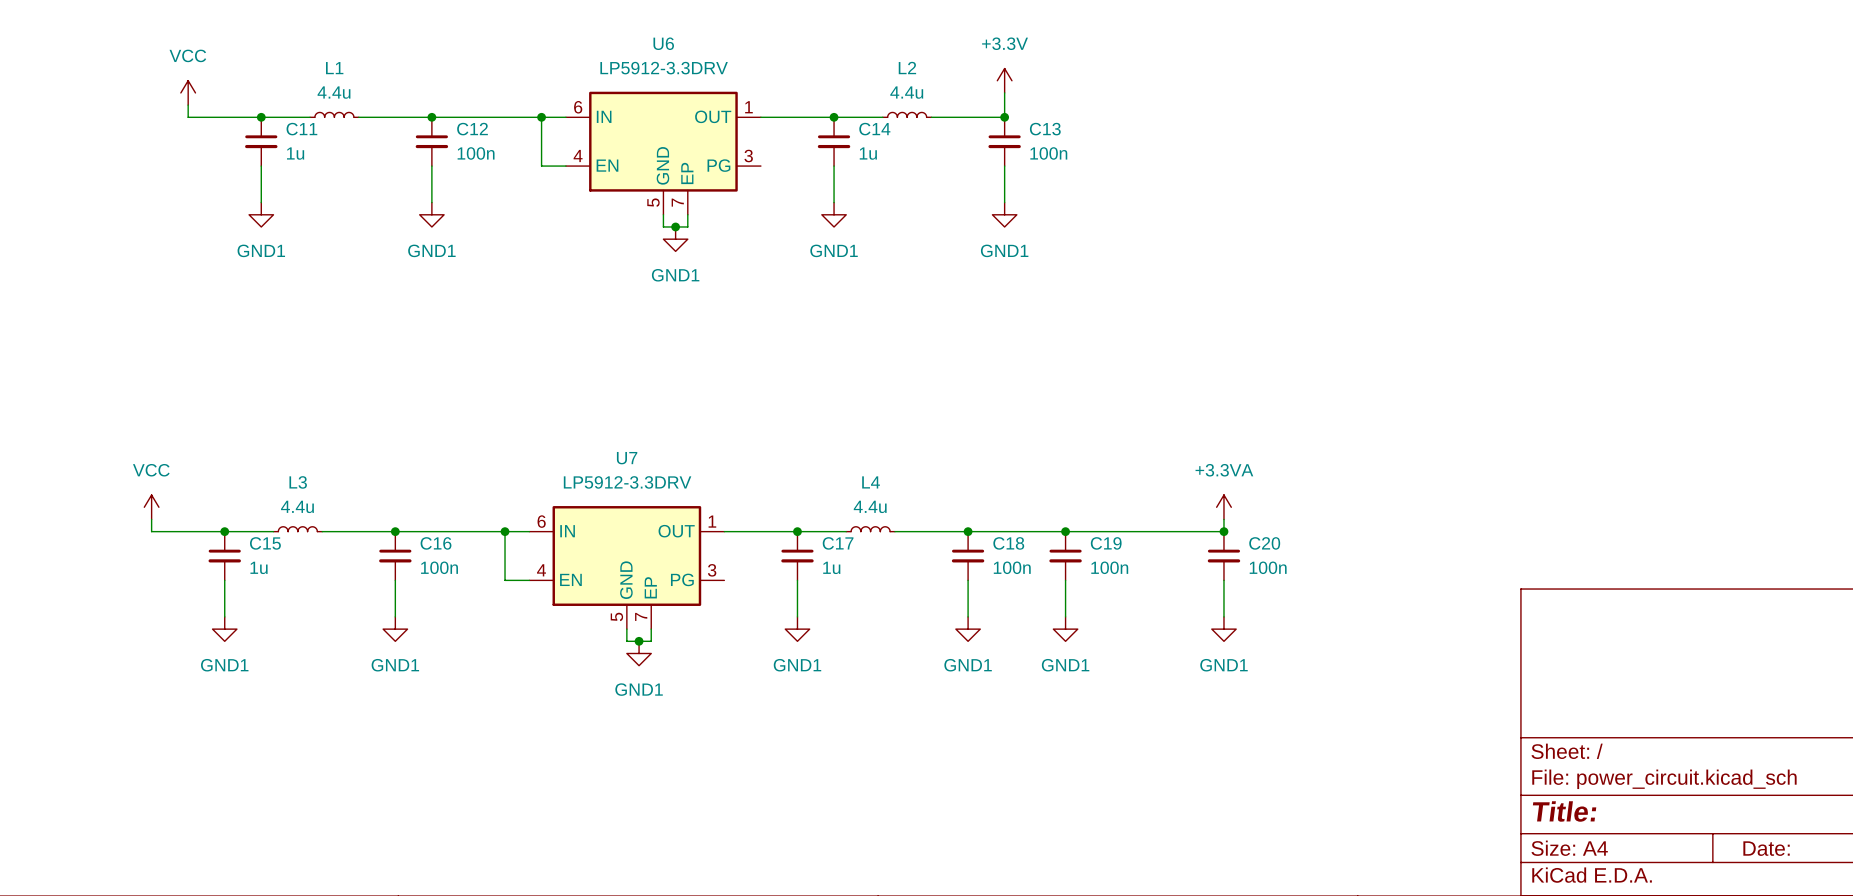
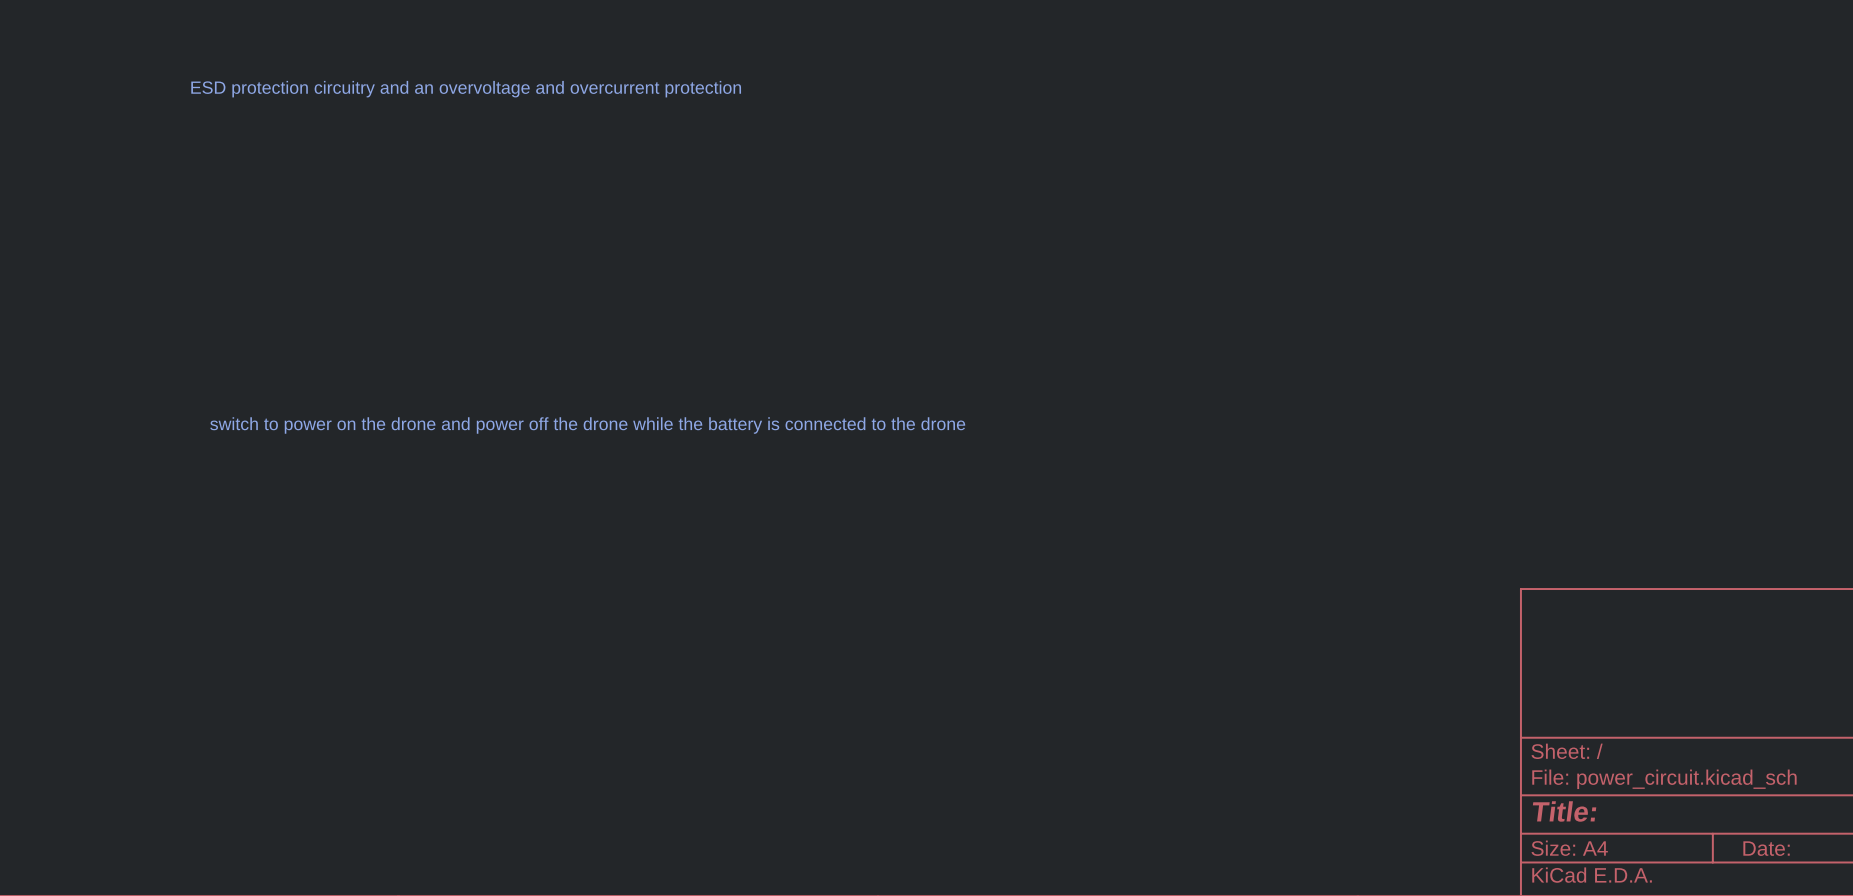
power symbol: +3.3V (1004, 80) -> none
text: none -> ESD protection circuitry and an overvoltage and overcurrent protection (466, 89)
power symbol: VCC (188, 92) -> none
wire: (1004, 92) (1004, 117) (931, 117) -> none
wire: (188, 105) (188, 117) (310, 117) -> none
L1: 4.4u (334, 114) -> none
L2: 4.4u (907, 114) -> none
junction: (261, 117) -> none
wire: (358, 117) (565, 117) -> none
junction: (431, 117) -> none
wire: (541, 117) (541, 166) (565, 166) -> none
junction: (541, 117) -> none
wire: (760, 117) (882, 117) -> none
junction: (834, 117) -> none
junction: (1004, 117) -> none
C11: 1u (261, 141) -> none
C12: 100n (431, 141) -> none
C14: 1u (834, 141) -> none
C13: 100n (1004, 141) -> none
U6: LP5912-3.3DRV (663, 153) -> none
wire: (261, 166) (261, 202) -> none
wire: (431, 166) (431, 202) -> none
wire: (834, 166) (834, 202) -> none
wire: (1004, 166) (1004, 202) -> none
power symbol: GND1 (261, 214) -> none
power symbol: GND1 (431, 214) -> none
wire: (663, 214) (663, 226) (687, 226) (687, 214) -> none
power symbol: GND1 (834, 214) -> none
power symbol: GND1 (1004, 214) -> none
junction: (675, 226) -> none
power symbol: GND1 (675, 239) -> none
text: none -> switch to power on the drone and power off the drone while the battery is connected to the drone (587, 425)
power symbol: VCC (151, 507) -> none
power symbol: +3.3VA (1223, 507) -> none
wire: (151, 519) (151, 531) (273, 531) -> none
wire: (1223, 519) (1223, 531) (894, 531) -> none
L3: 4.4u (297, 529) -> none
L4: 4.4u (870, 529) -> none
junction: (224, 531) -> none
wire: (322, 531) (529, 531) -> none
junction: (395, 531) -> none
wire: (505, 531) (505, 580) (529, 580) -> none
junction: (505, 531) -> none
wire: (724, 531) (846, 531) -> none
junction: (797, 531) -> none
junction: (968, 531) -> none
junction: (1065, 531) -> none
junction: (1223, 531) -> none
C15: 1u (224, 556) -> none
C16: 100n (395, 556) -> none
C17: 1u (797, 556) -> none
C18: 100n (968, 556) -> none
C19: 100n (1065, 556) -> none
C20: 100n (1223, 556) -> none
U7: LP5912-3.3DRV (626, 567) -> none
wire: (224, 580) (224, 616) -> none
wire: (395, 580) (395, 616) -> none
wire: (797, 580) (797, 616) -> none
wire: (968, 580) (968, 616) -> none
wire: (1065, 580) (1065, 616) -> none
wire: (1223, 580) (1223, 616) -> none
power symbol: GND1 (224, 629) -> none
power symbol: GND1 (395, 629) -> none
wire: (626, 629) (626, 641) (651, 641) (651, 629) -> none
power symbol: GND1 (797, 629) -> none
power symbol: GND1 (968, 629) -> none
power symbol: GND1 (1065, 629) -> none
power symbol: GND1 (1223, 629) -> none
junction: (639, 641) -> none
power symbol: GND1 (639, 653) -> none

